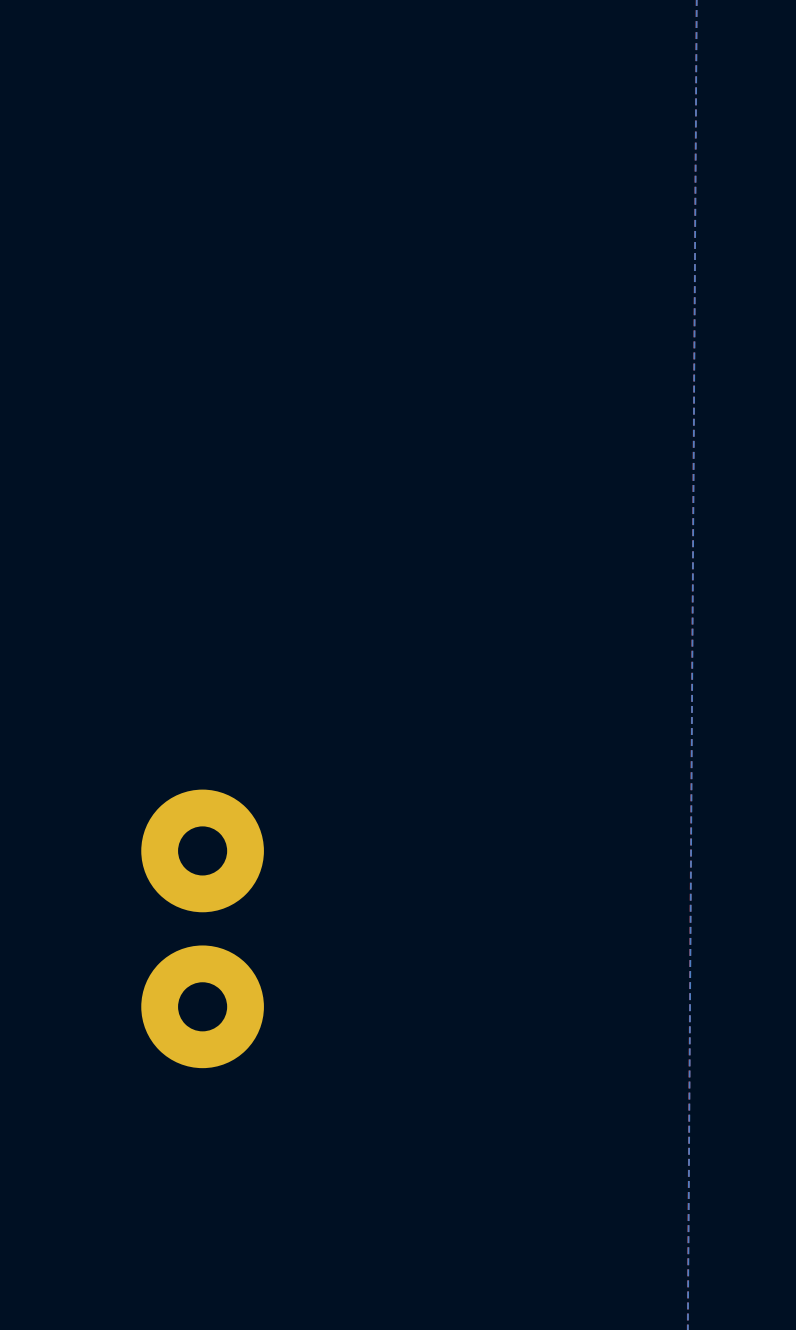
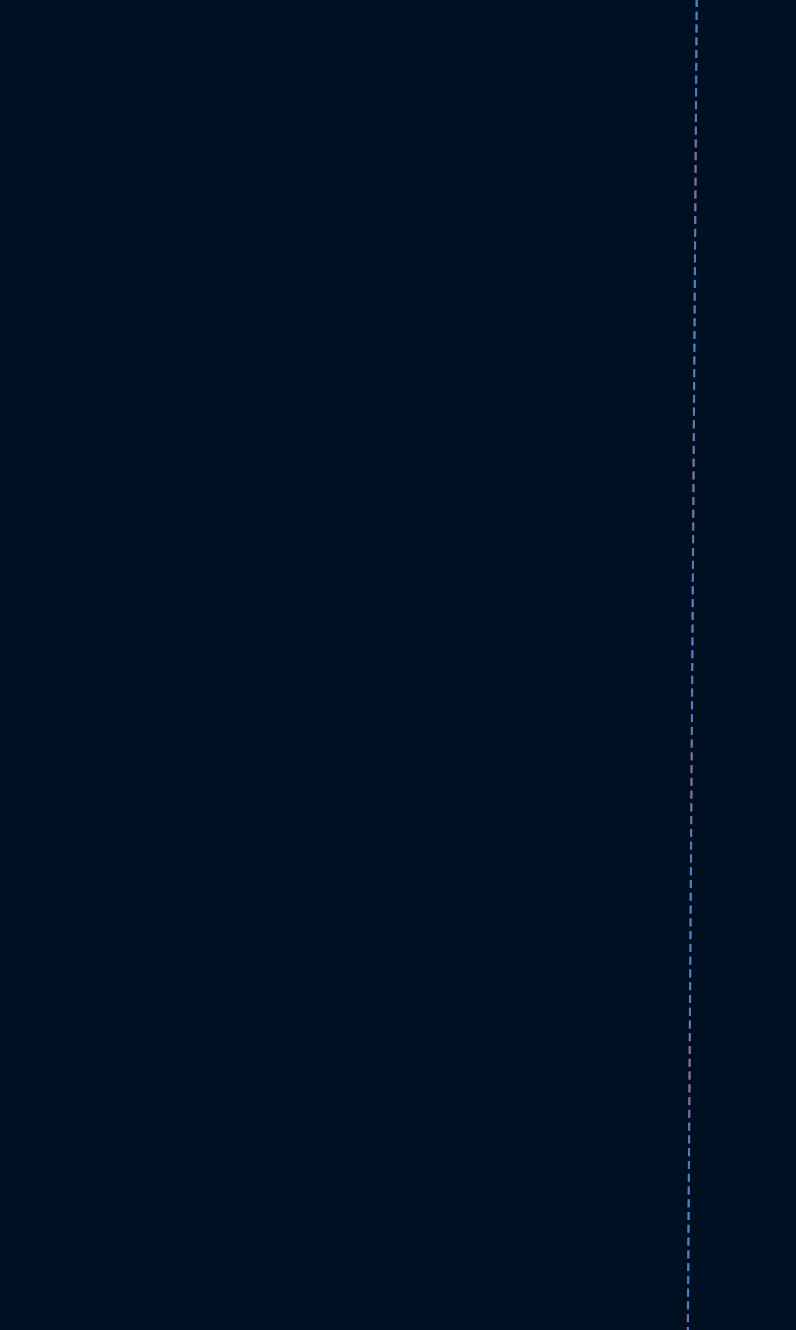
part: (202, 850) -> none
part: (202, 1006) -> none

